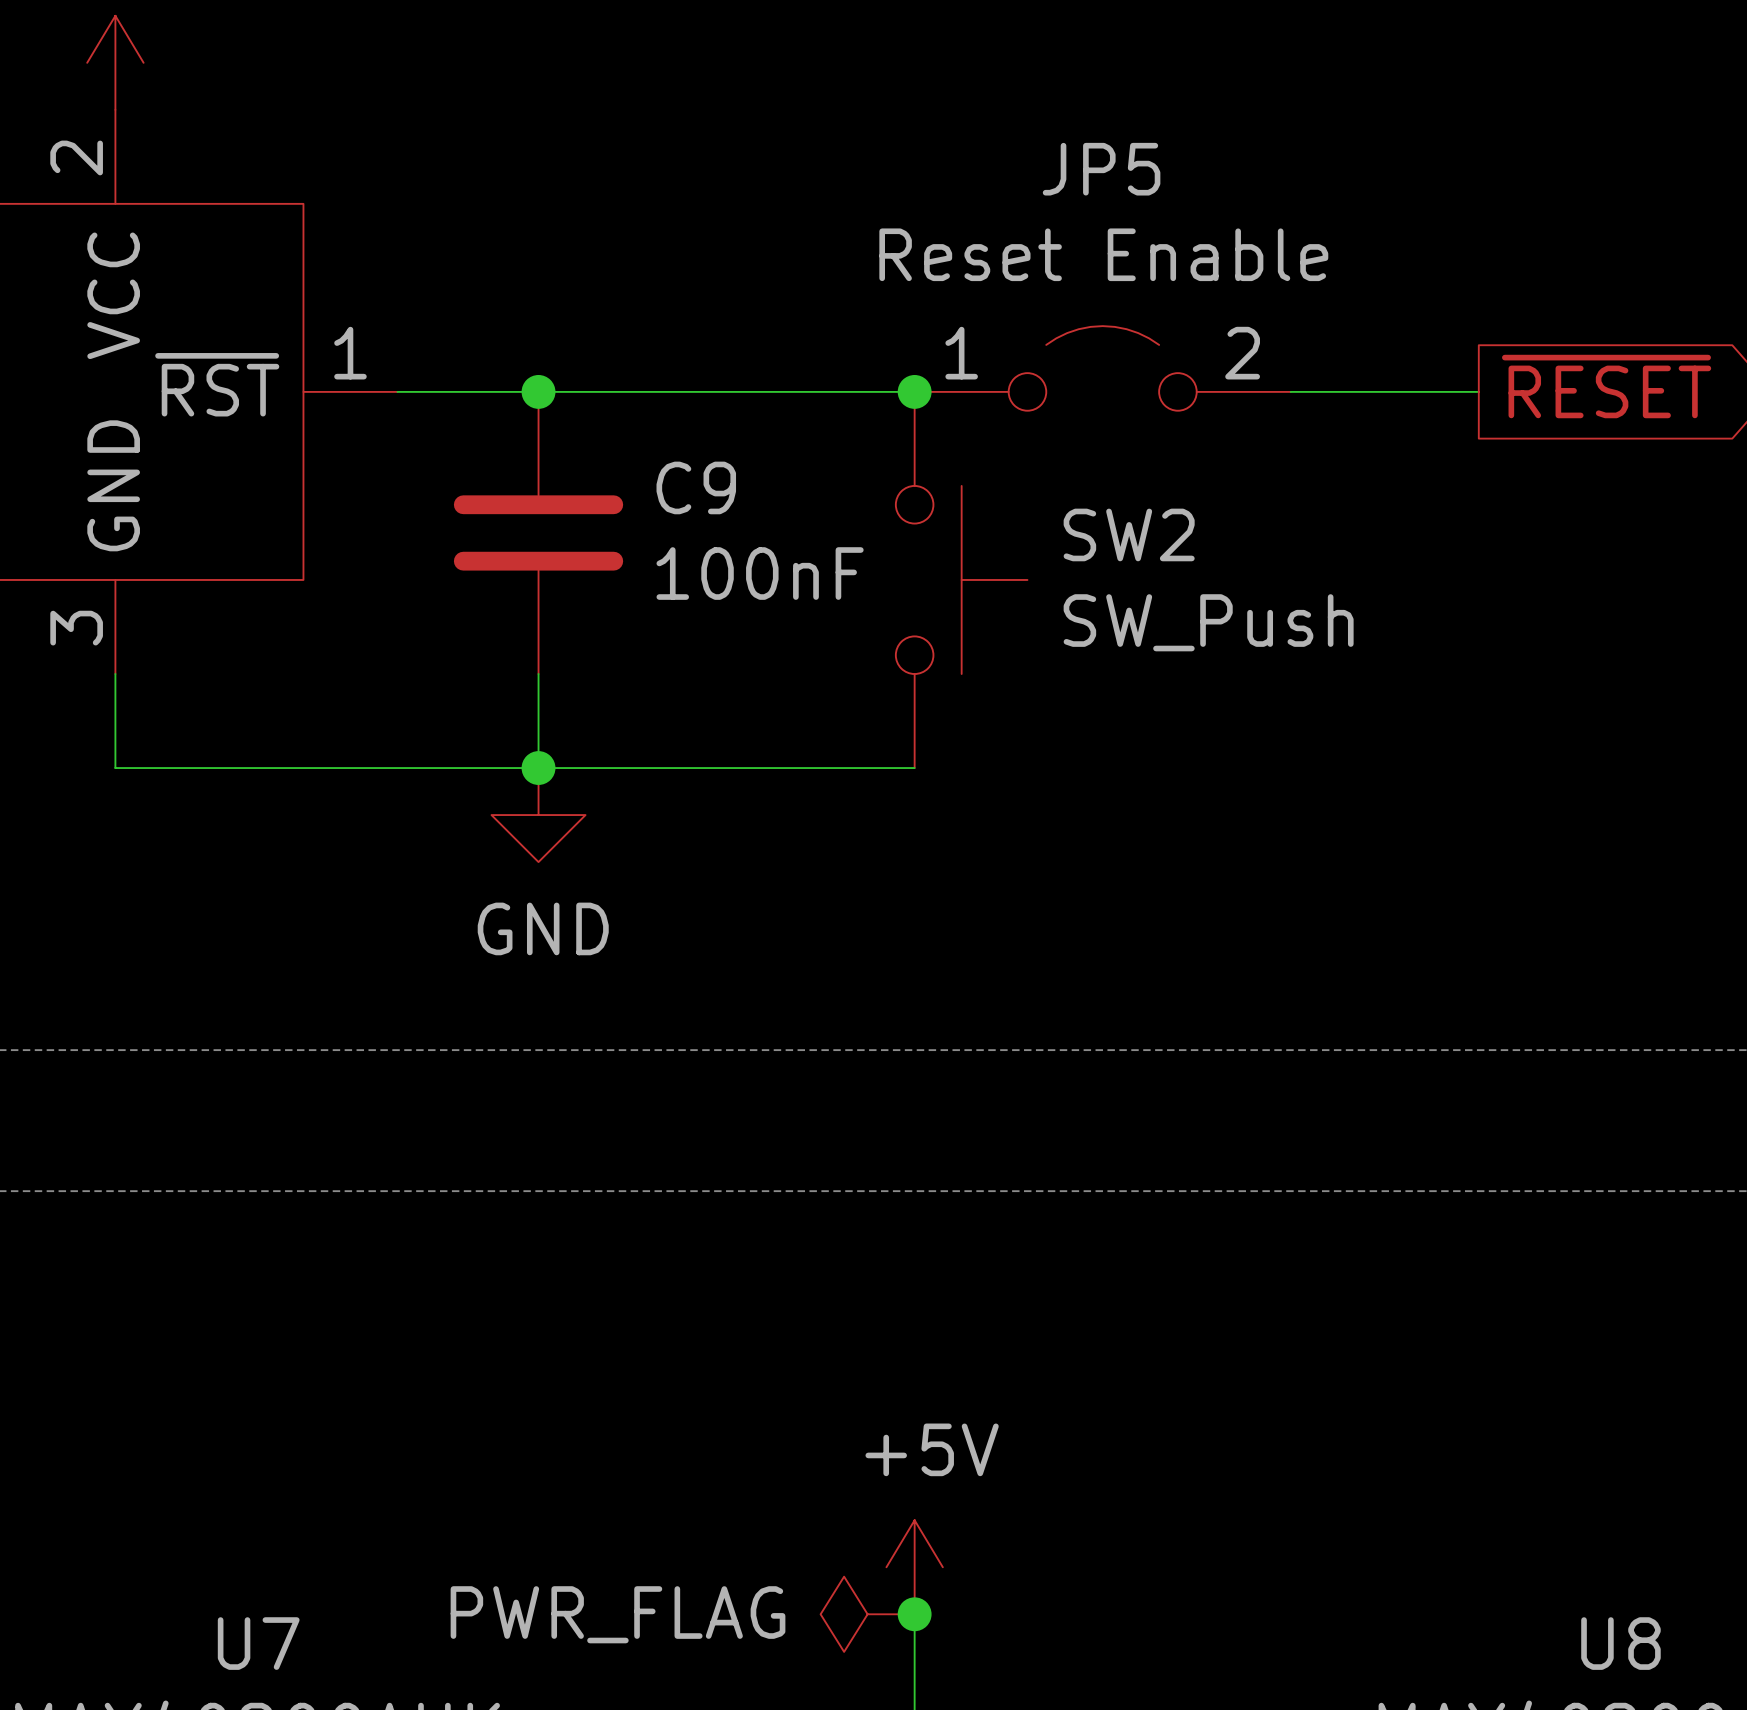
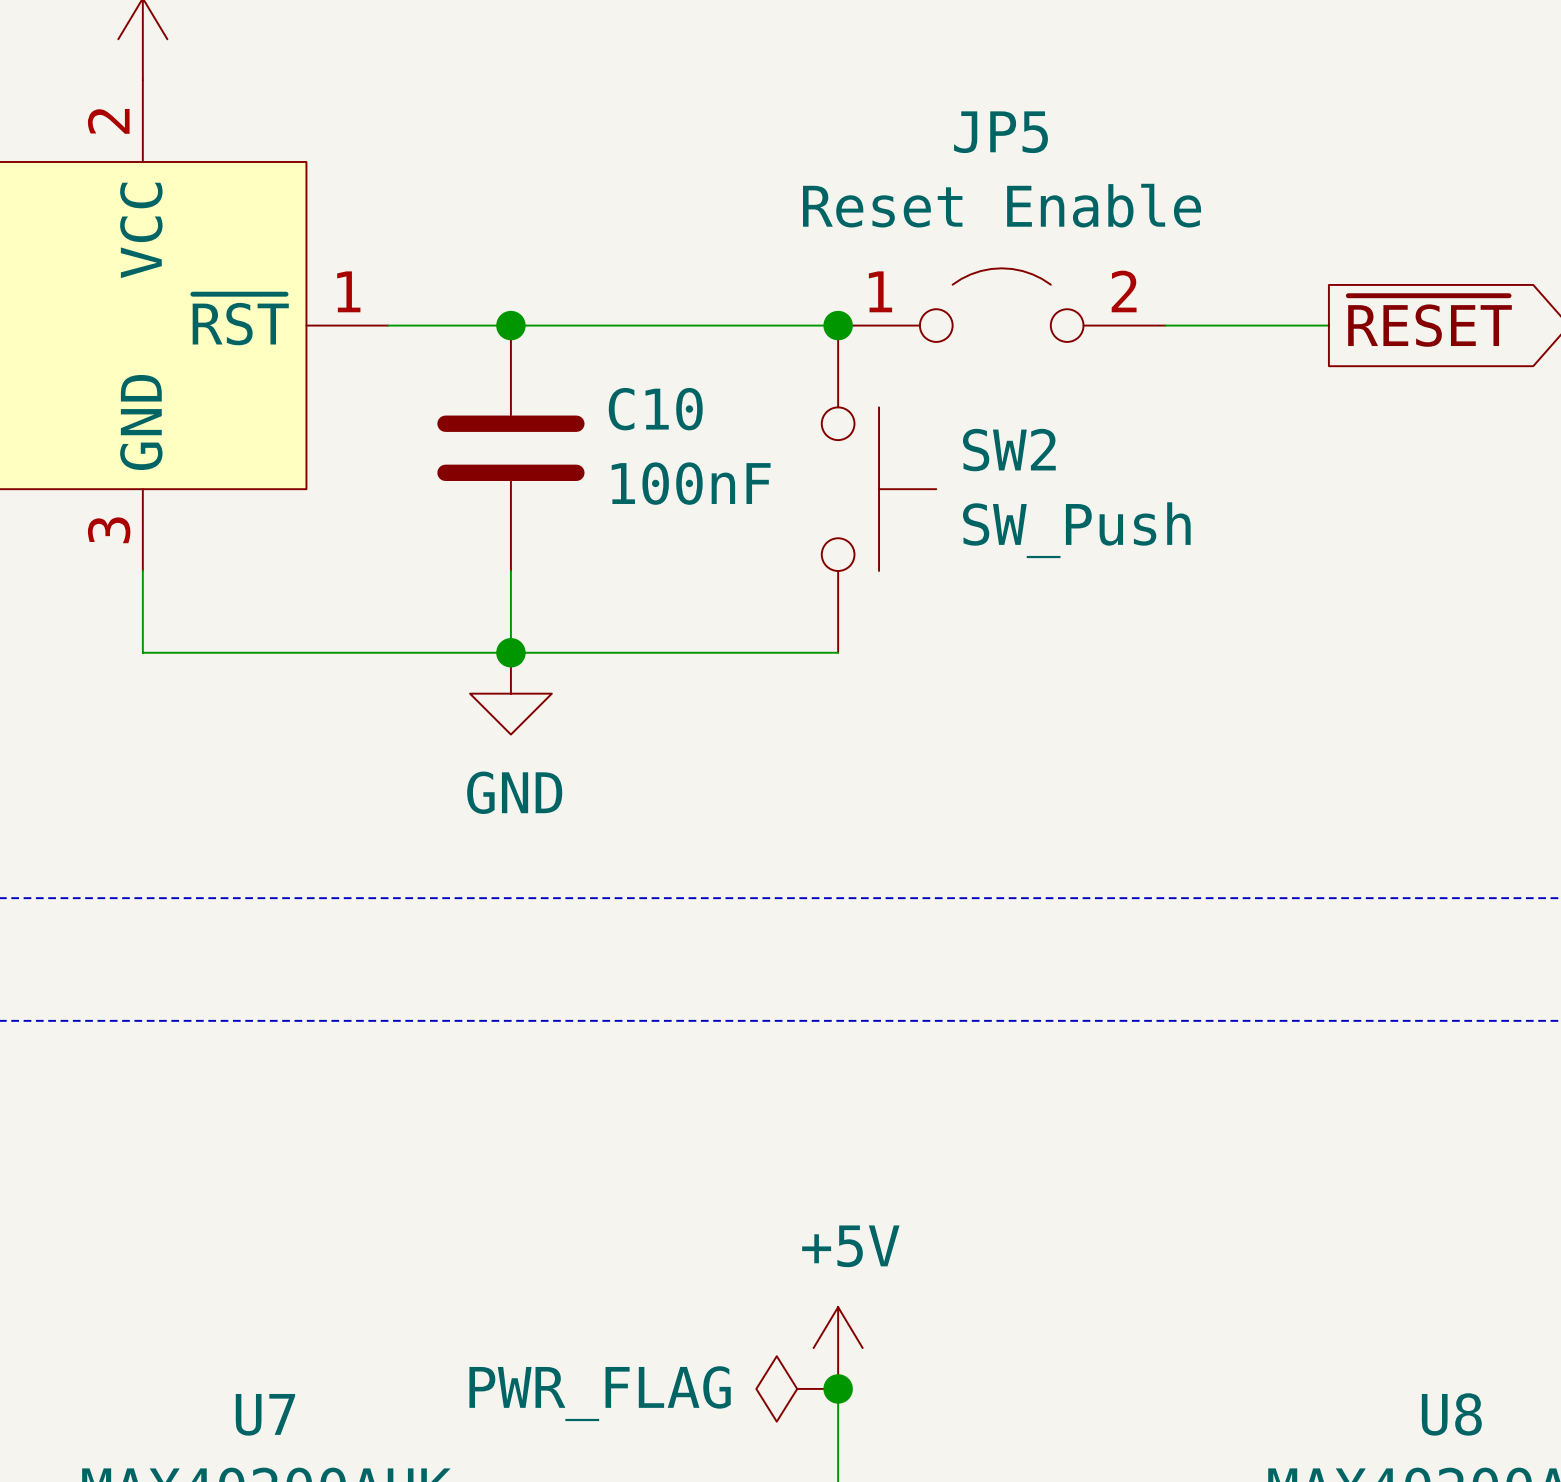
C9 name: C9 (696, 487) -> C10 (655, 409)

